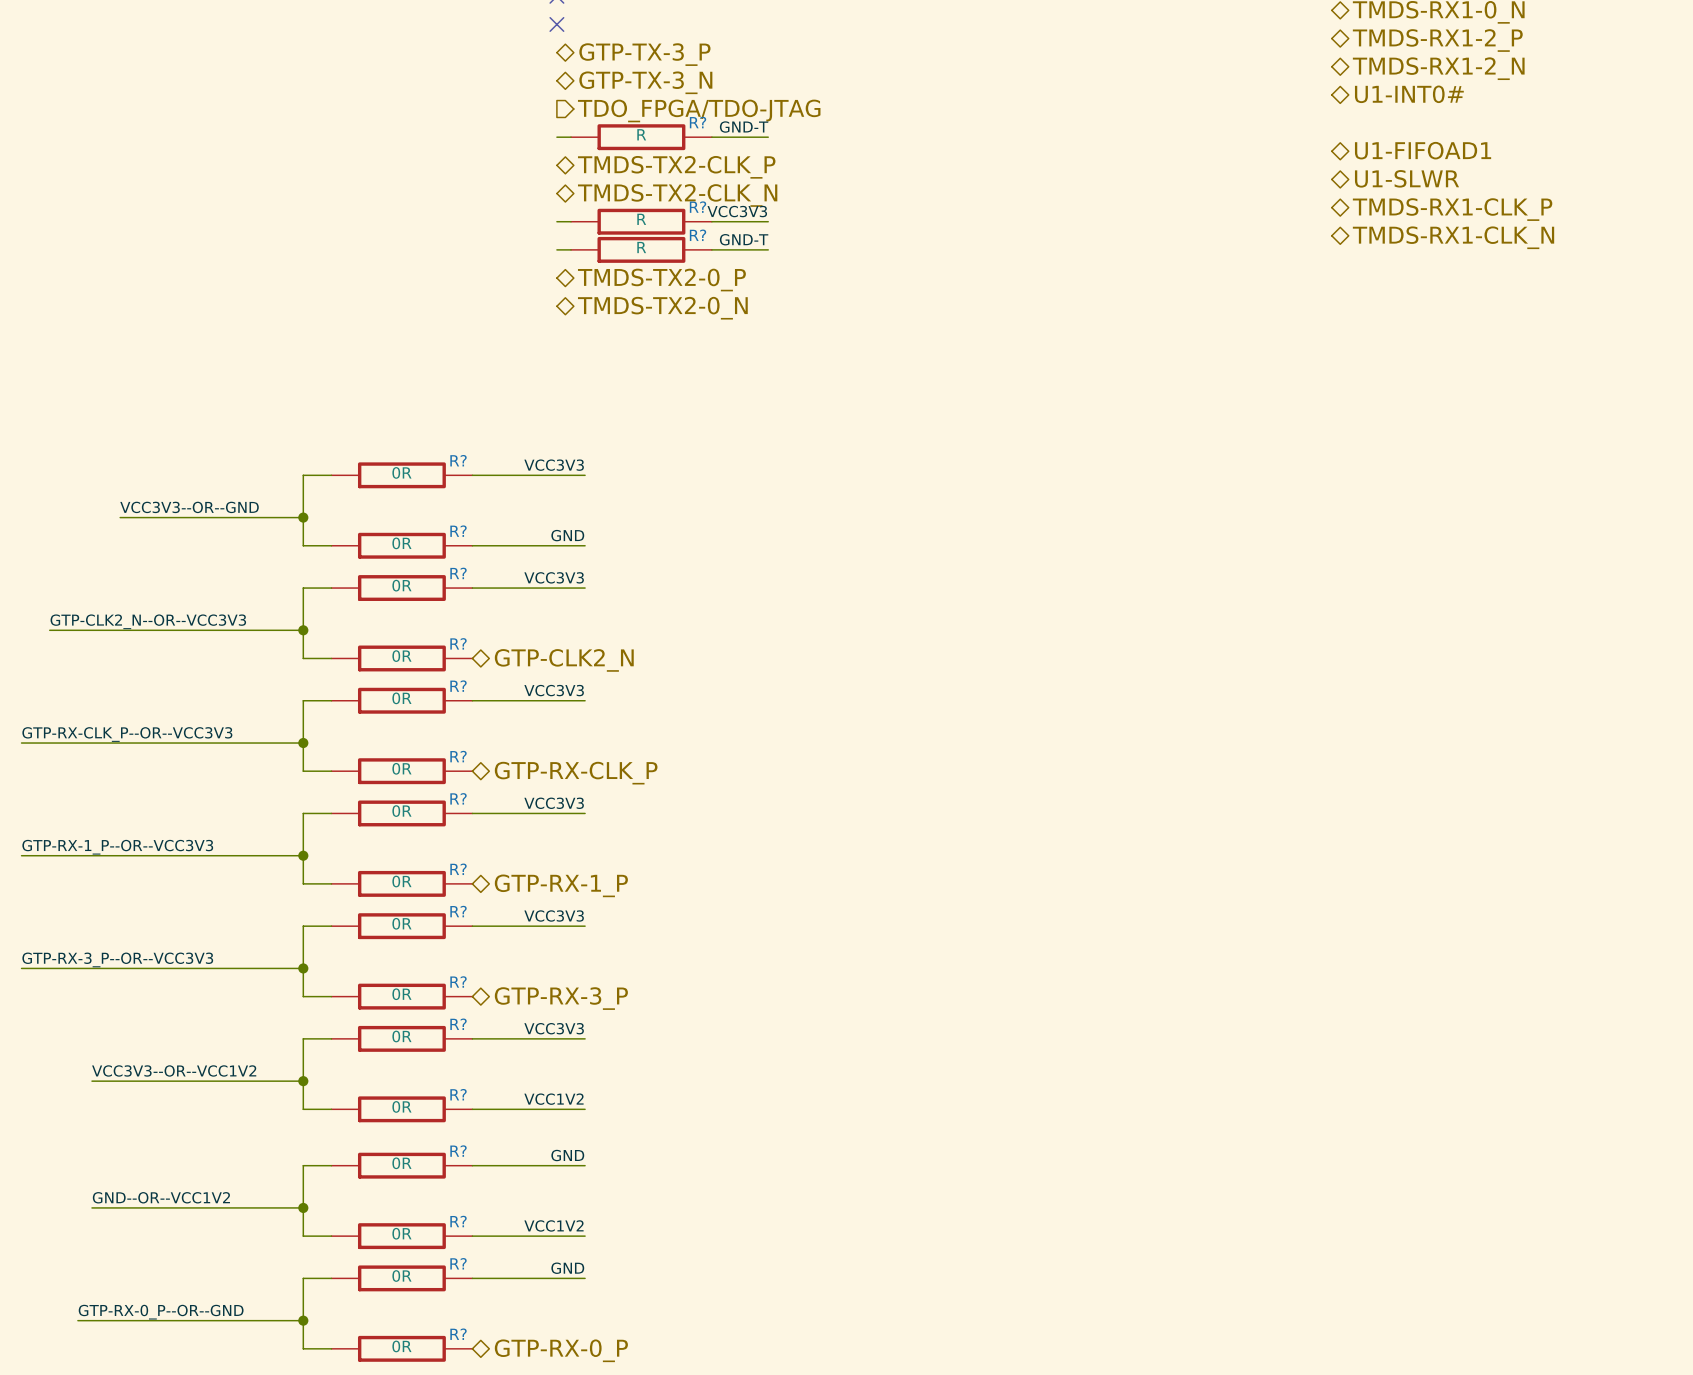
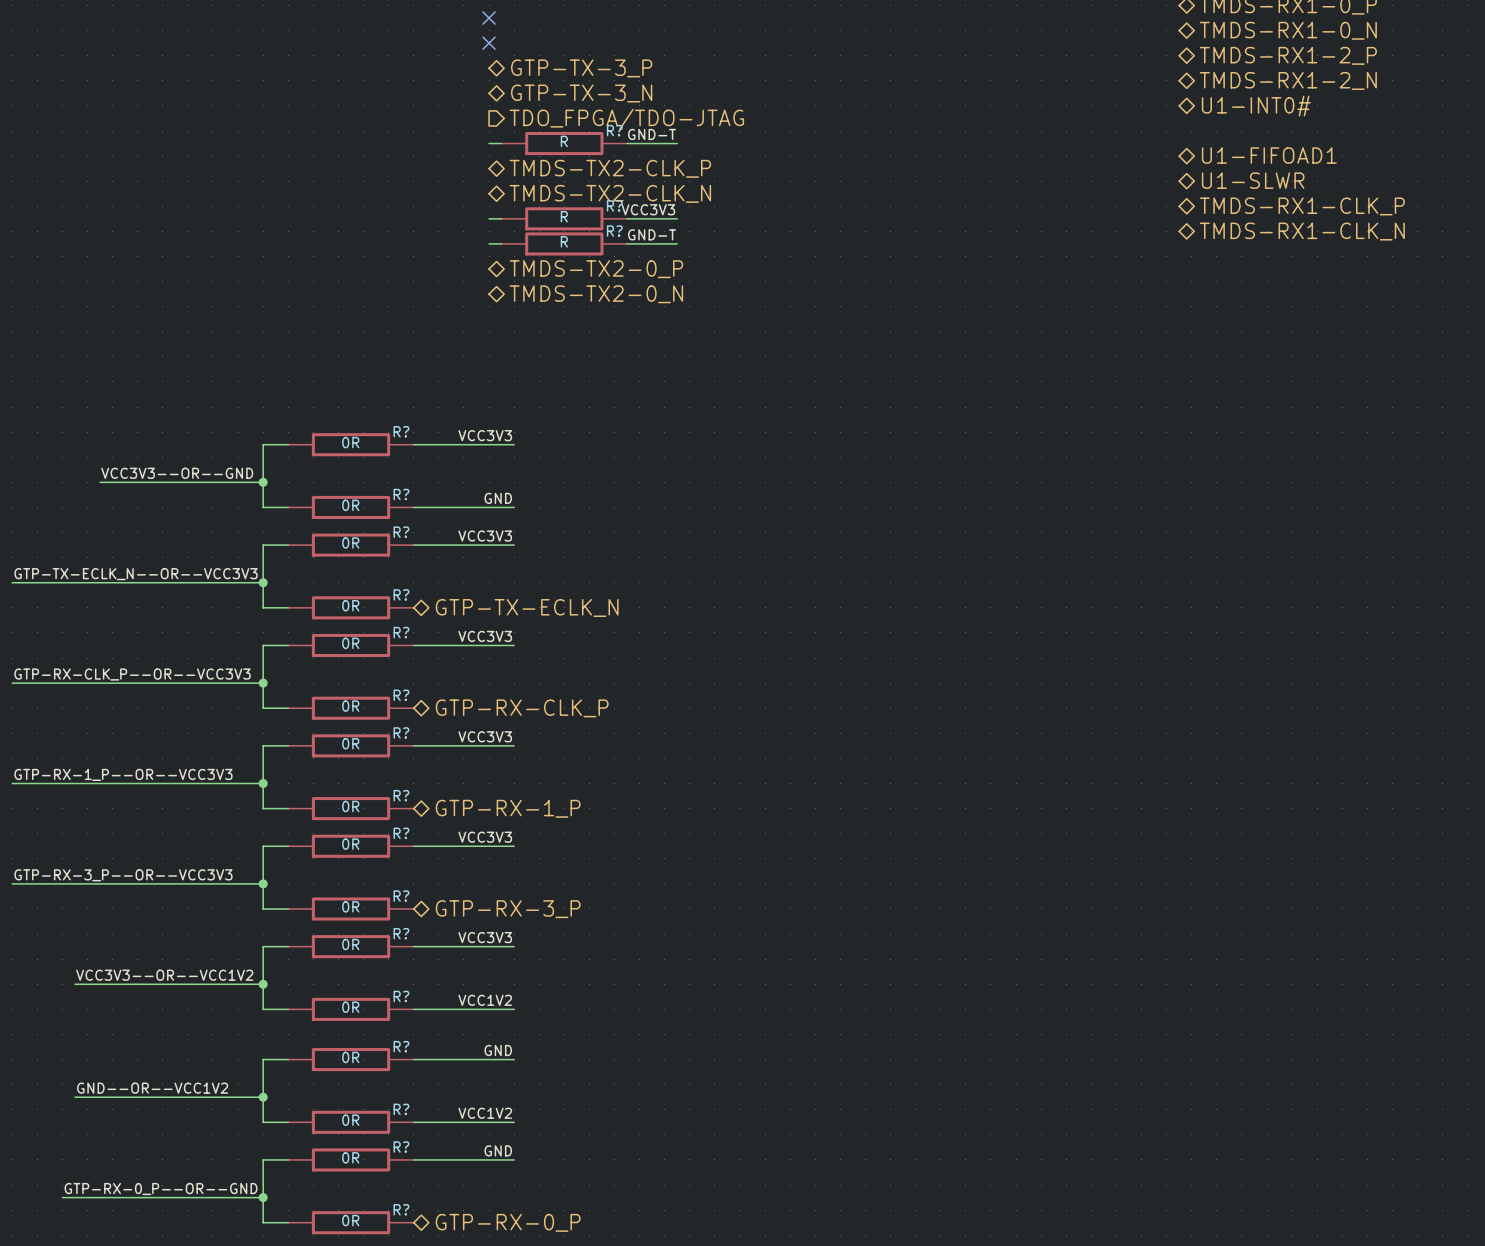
label: GTP-CLK2_N--OR--VCC3V3 (148, 621) -> GTP-TX-ECLK_N--OR--VCC3V3 (136, 574)
wire: none -> (12, 582) (37, 582)
hierarchical label: GTP-CLK2_N (564, 660) -> GTP-TX-ECLK_N (527, 607)

